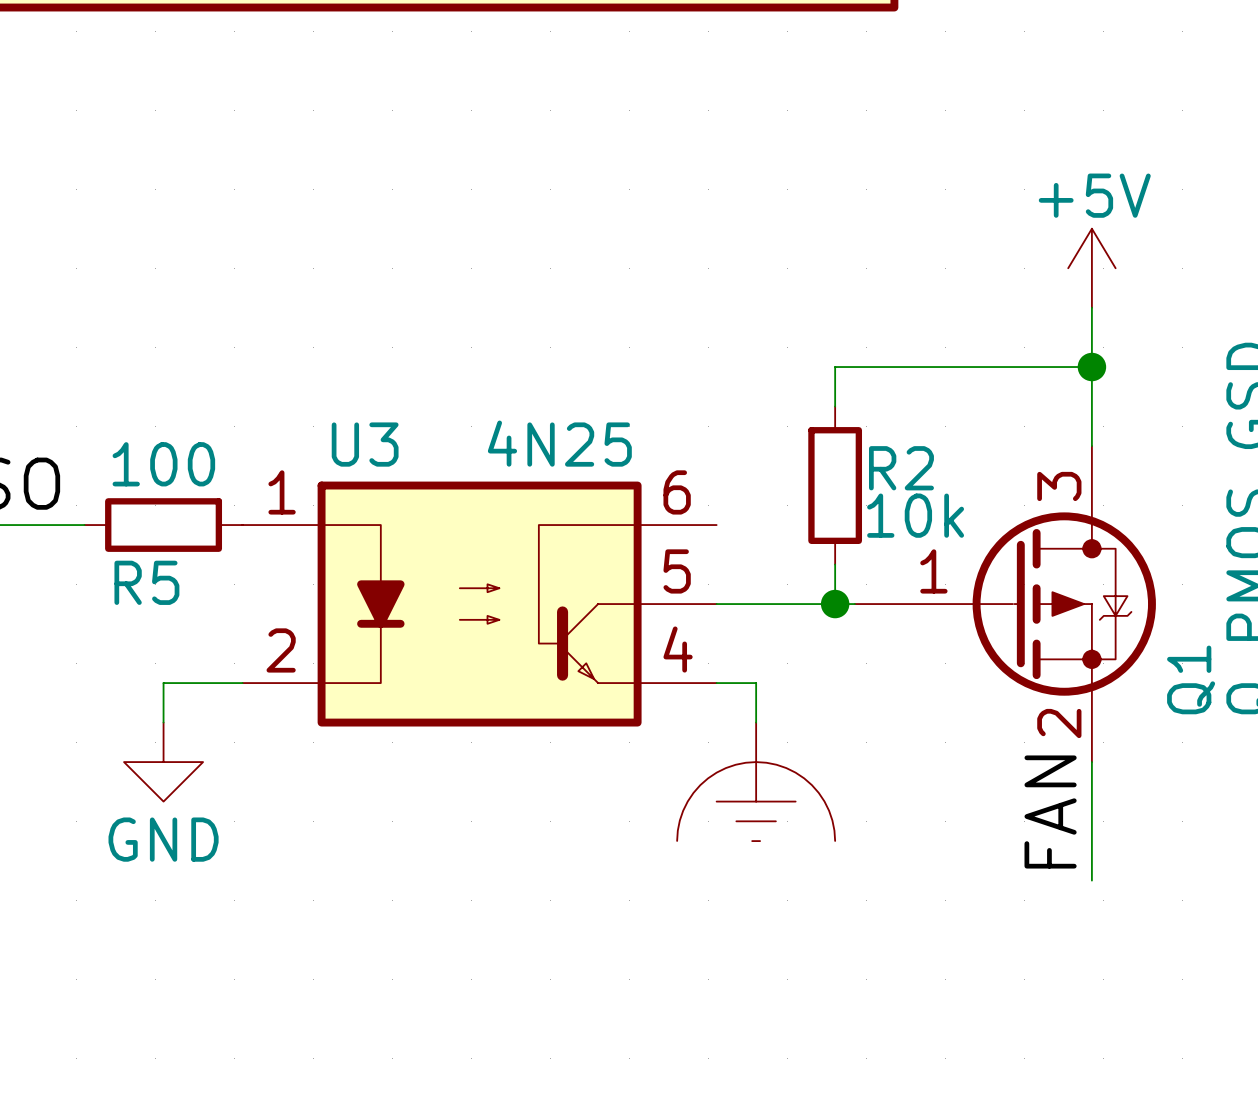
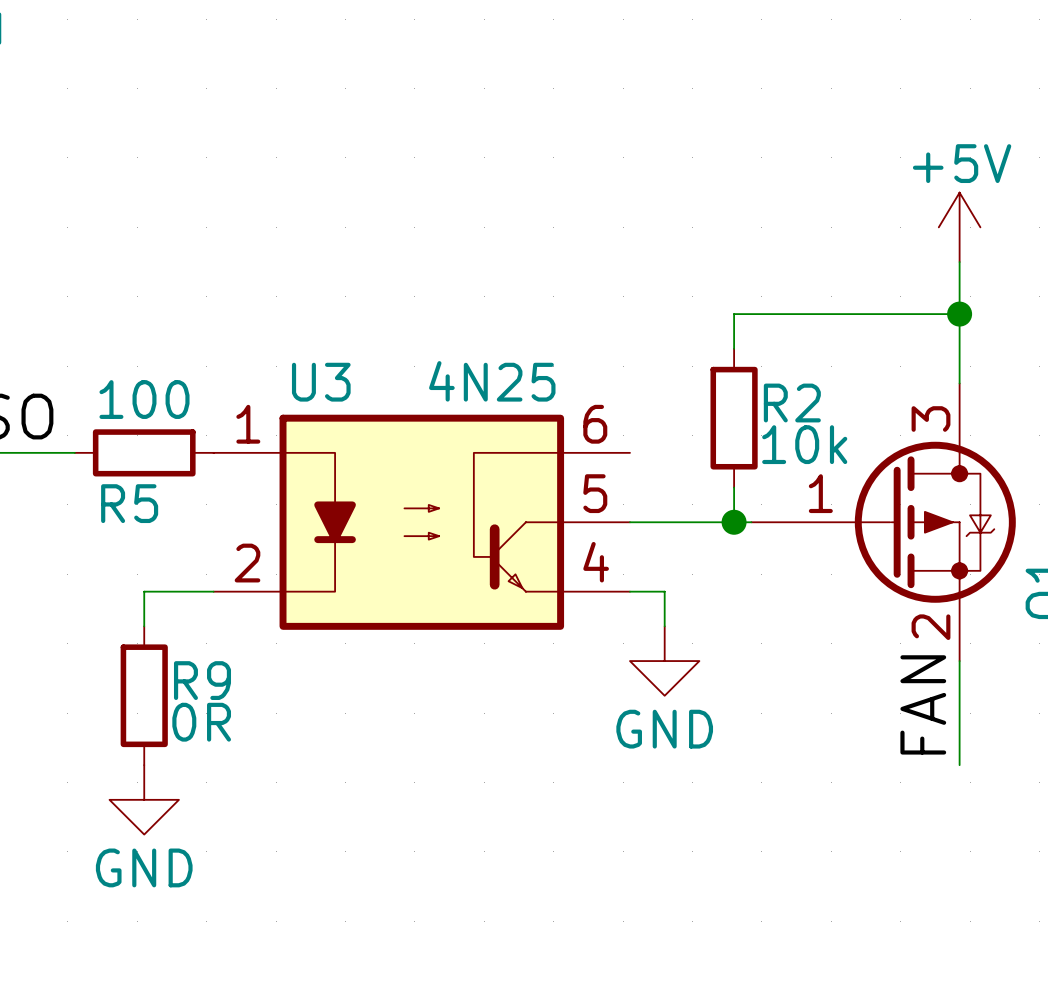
power symbol shape: [677, 722, 836, 842] -> [629, 626, 700, 696]
power symbol position: GND (163, 762) -> GND (144, 799)
R9: none -> 0R (144, 695)
power symbol text: none -> GND (664, 729)

